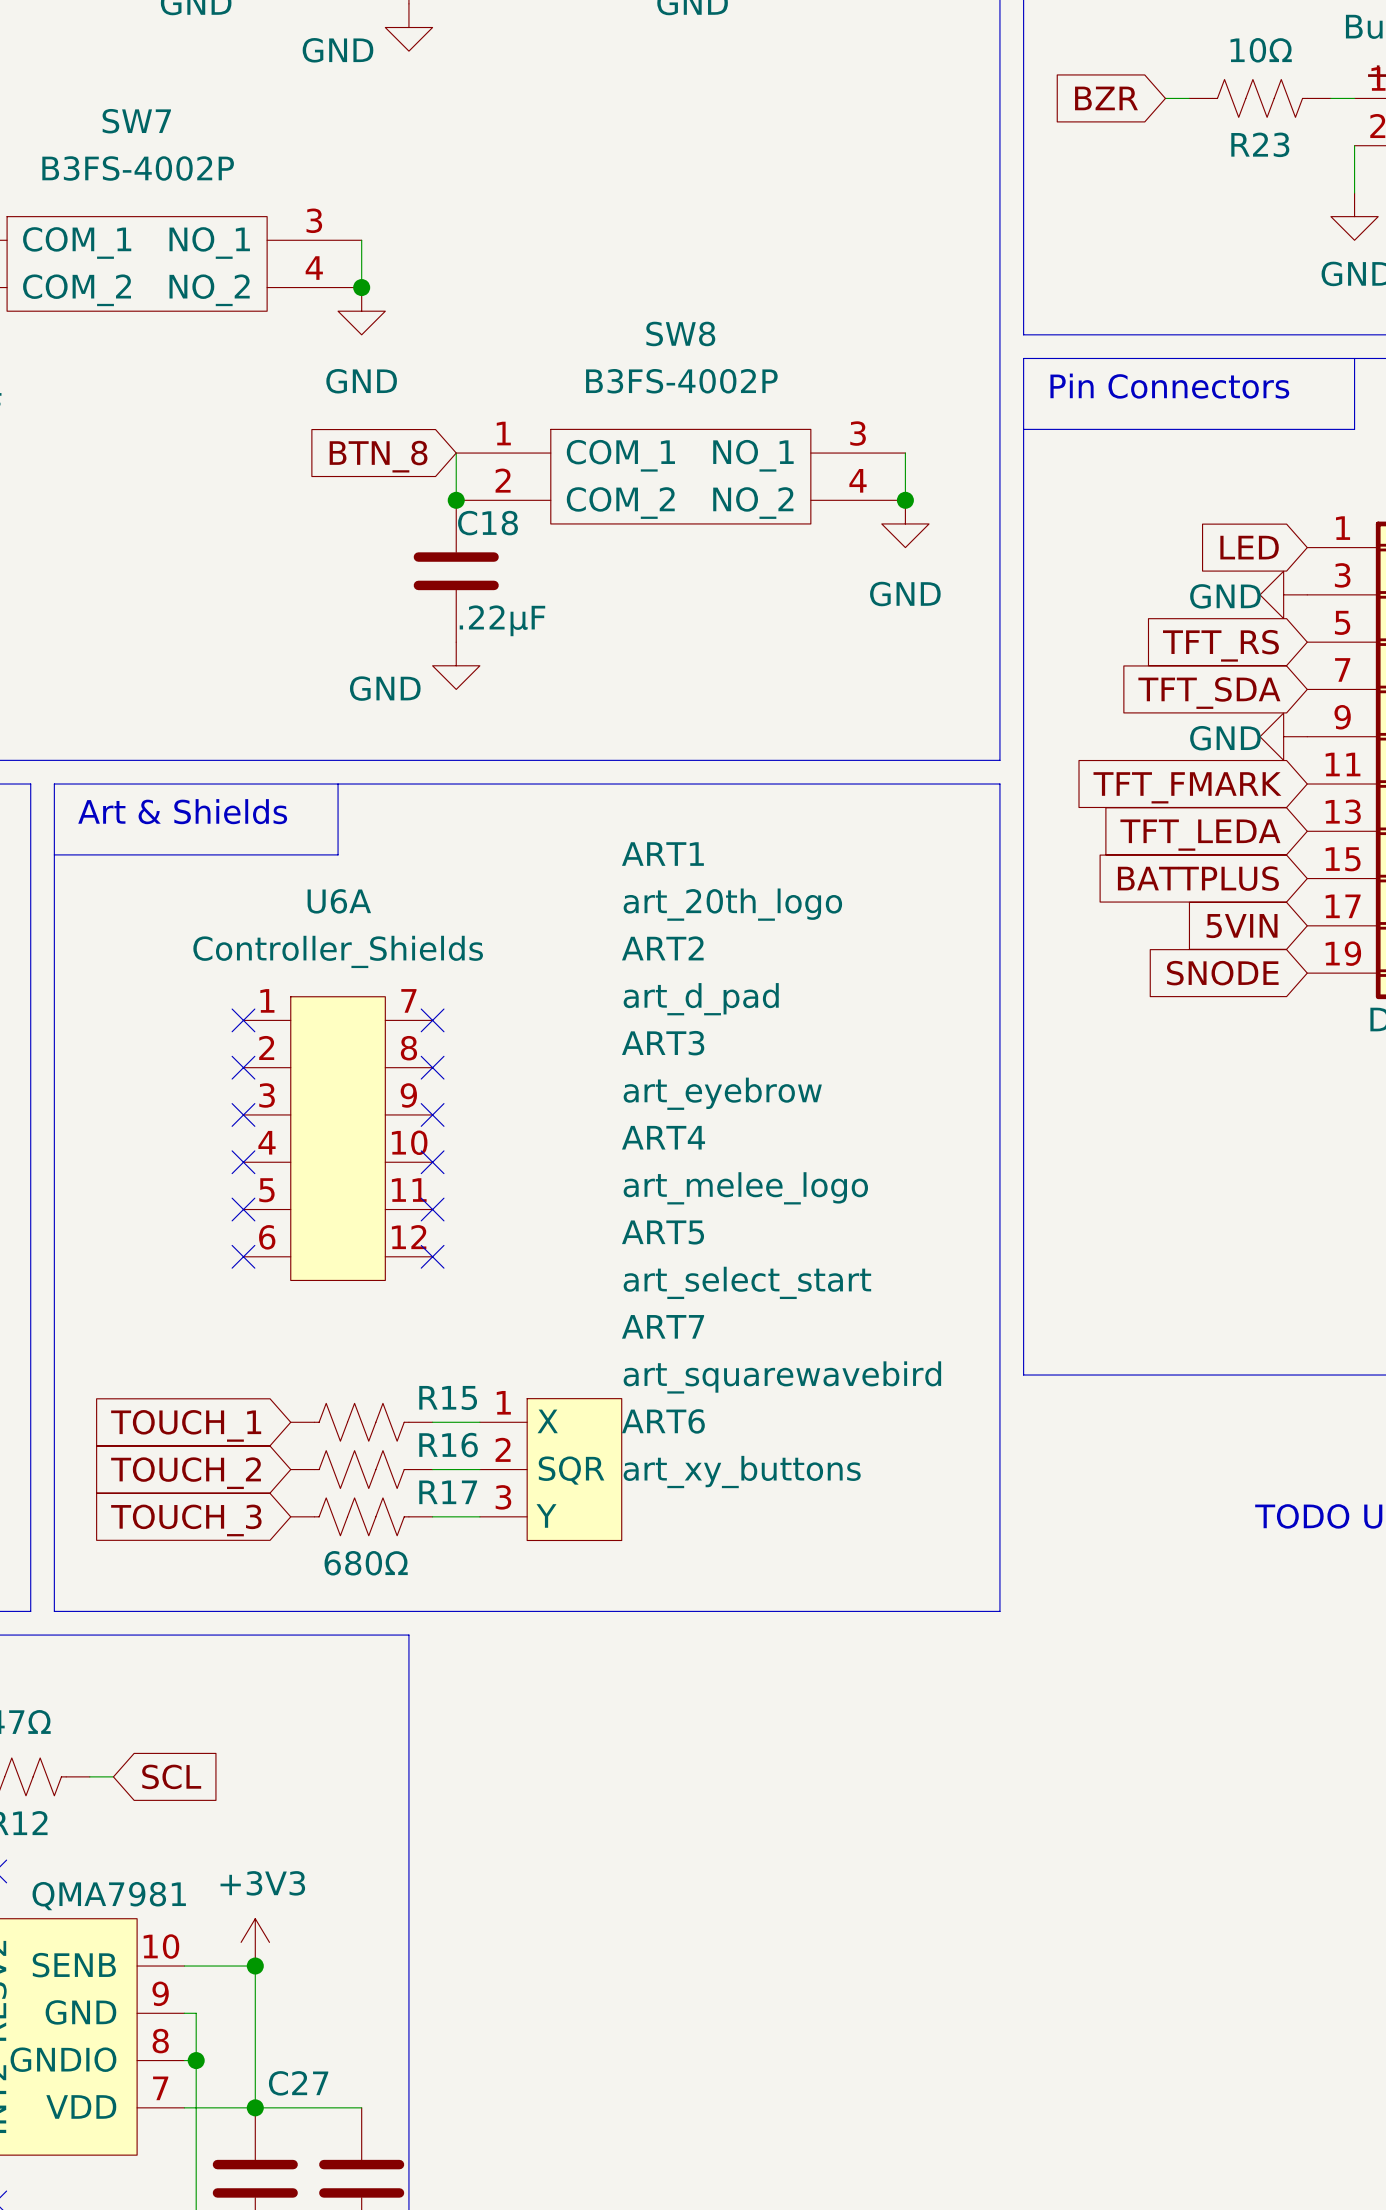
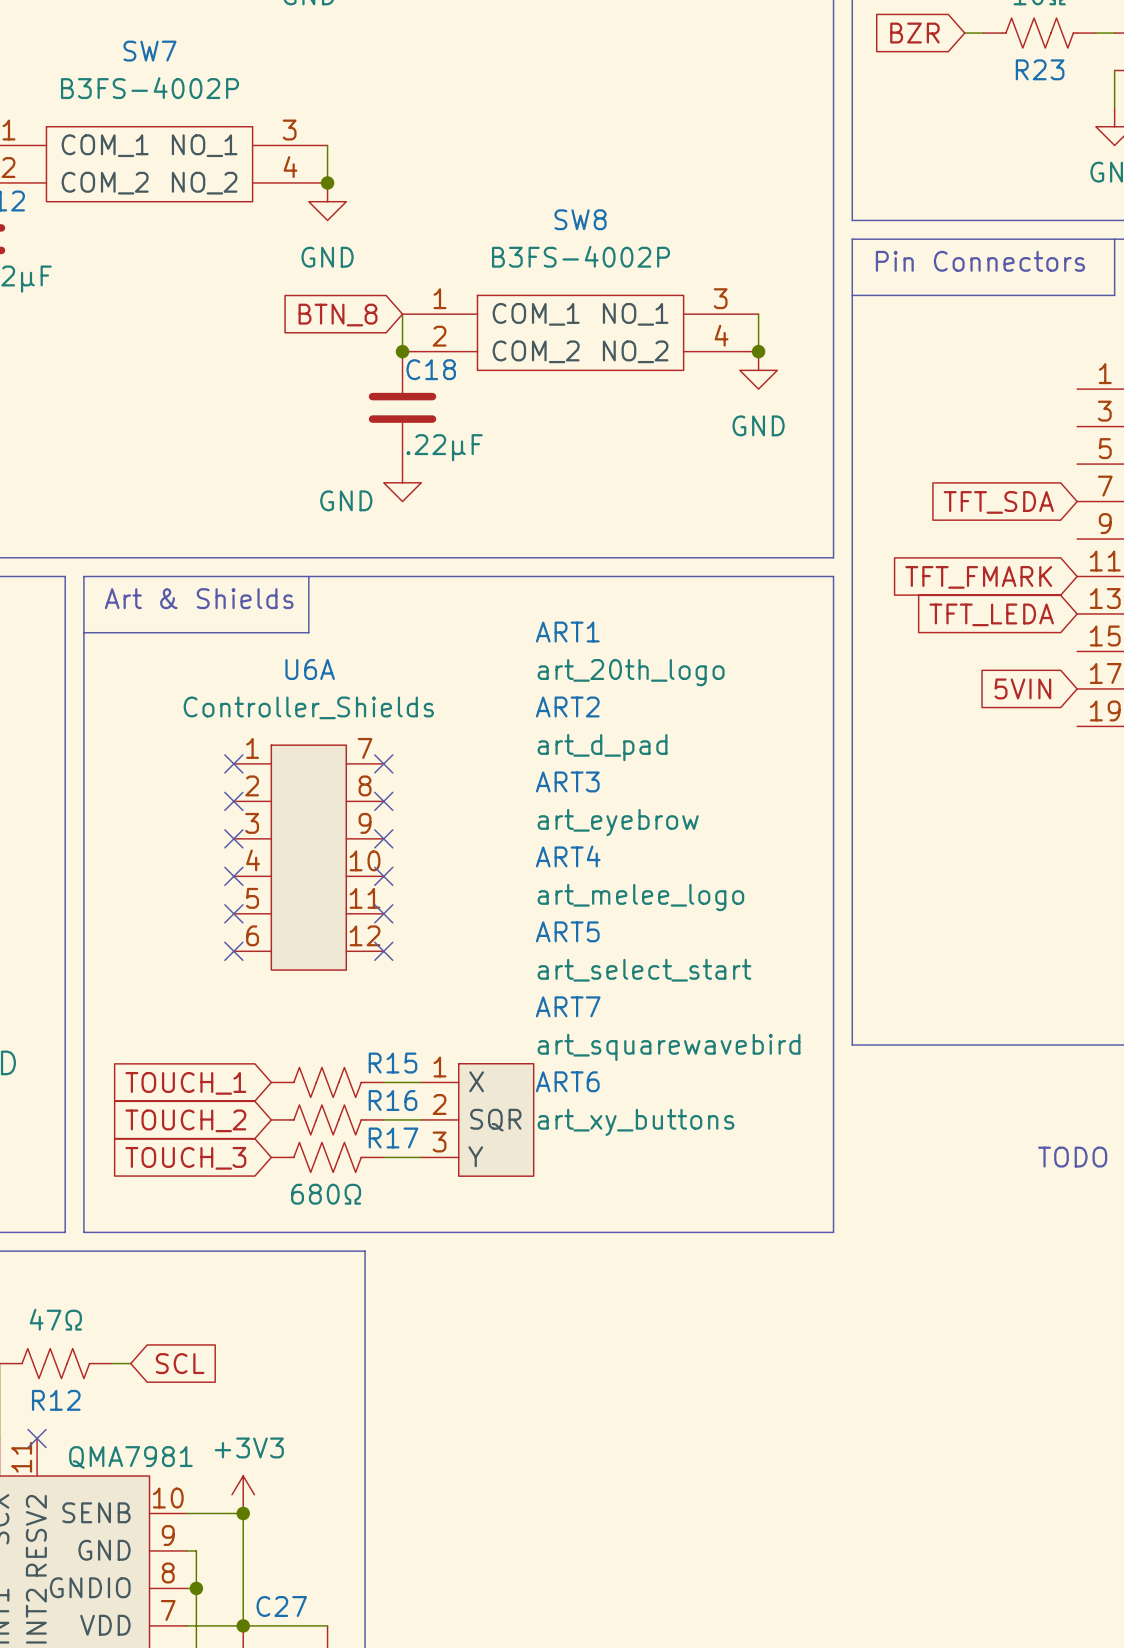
global label: LED (1249, 547) -> none
power symbol: GND (1283, 594) -> none
global label: TFT_RS (1220, 645) -> none
power symbol: GND (1283, 736) -> none
global label: BATTPLUS (1198, 878) -> none
global label: SNODE (1222, 973) -> none

